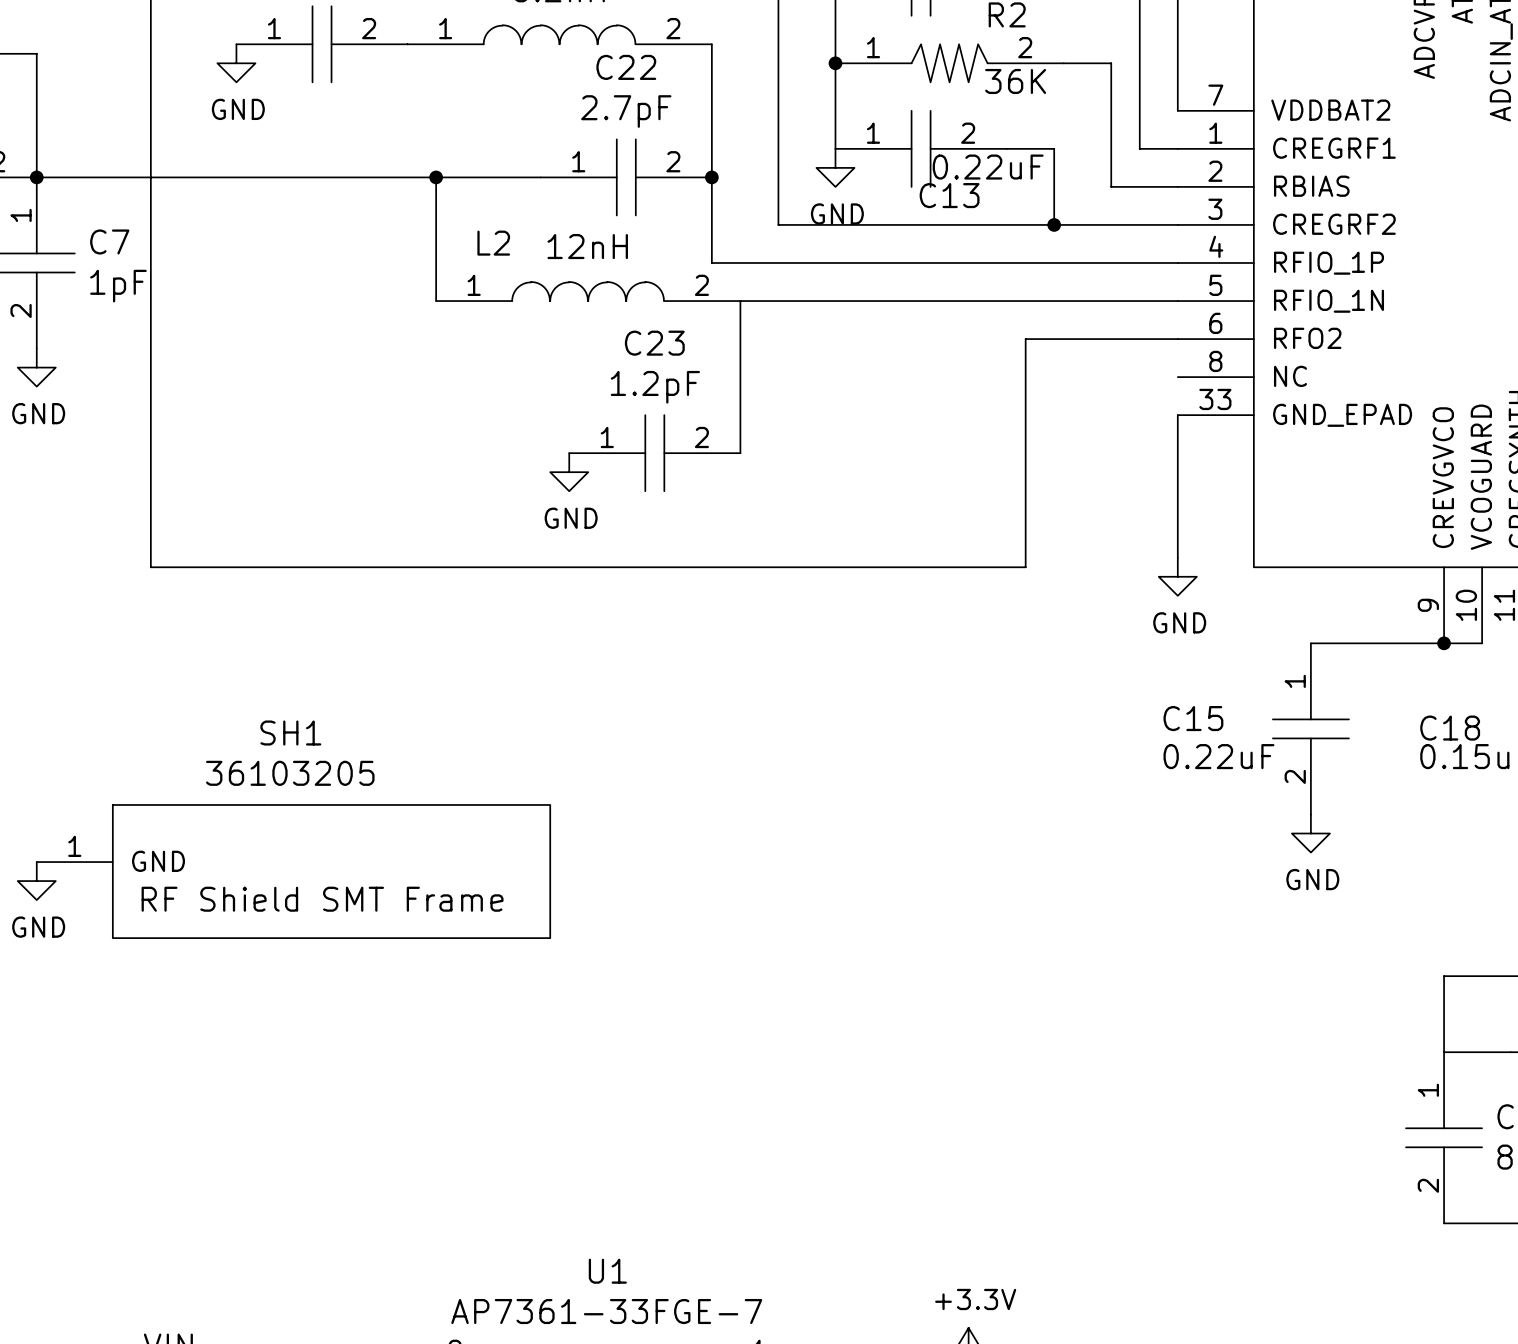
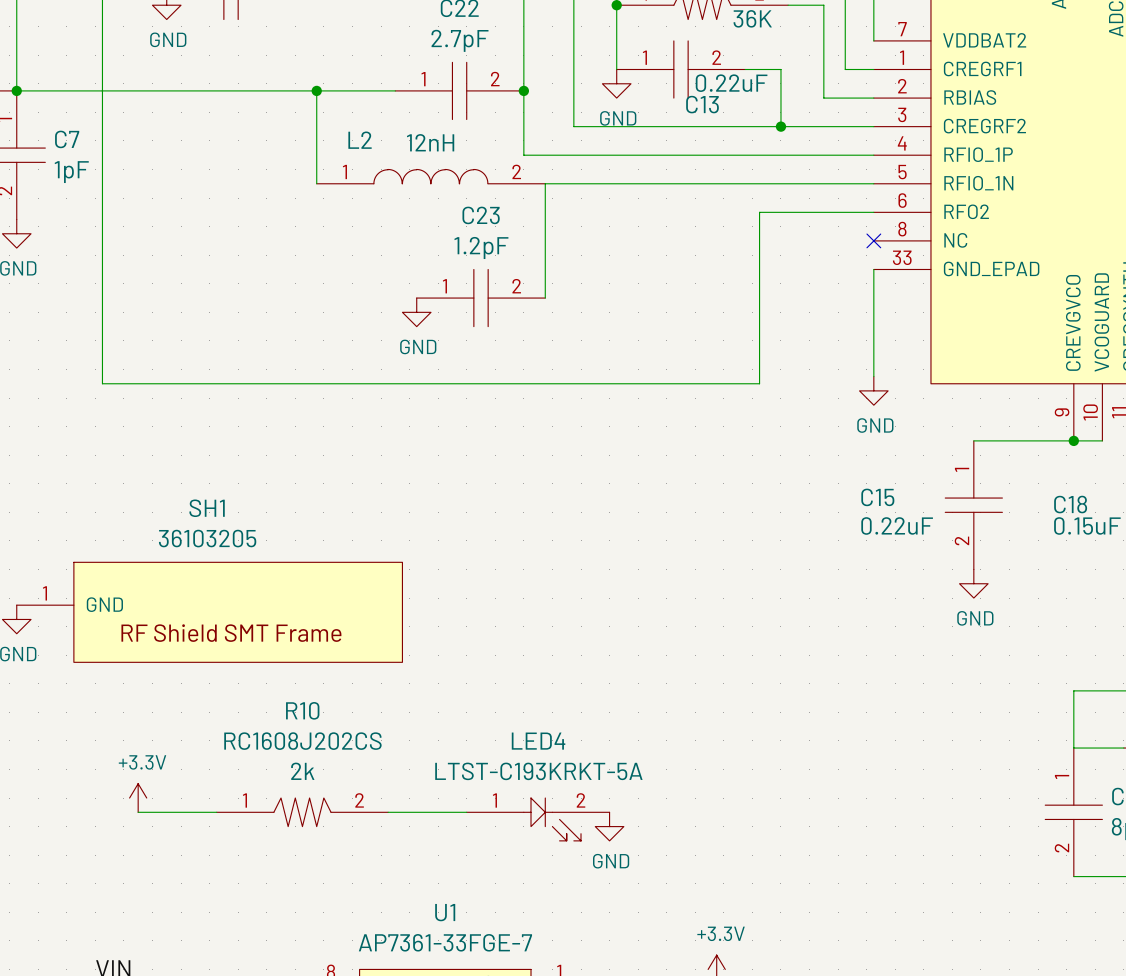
no-connect mark: none -> (873, 240)
power symbol: none -> +3.3V (138, 798)
wire: none -> (138, 812) (216, 812)
R10: none -> RC1608J202CS (302, 812)
wire: none -> (388, 812) (466, 812)
LED4: none -> LTST-C193KRKT-5A (538, 819)
power symbol: none -> GND (609, 826)

